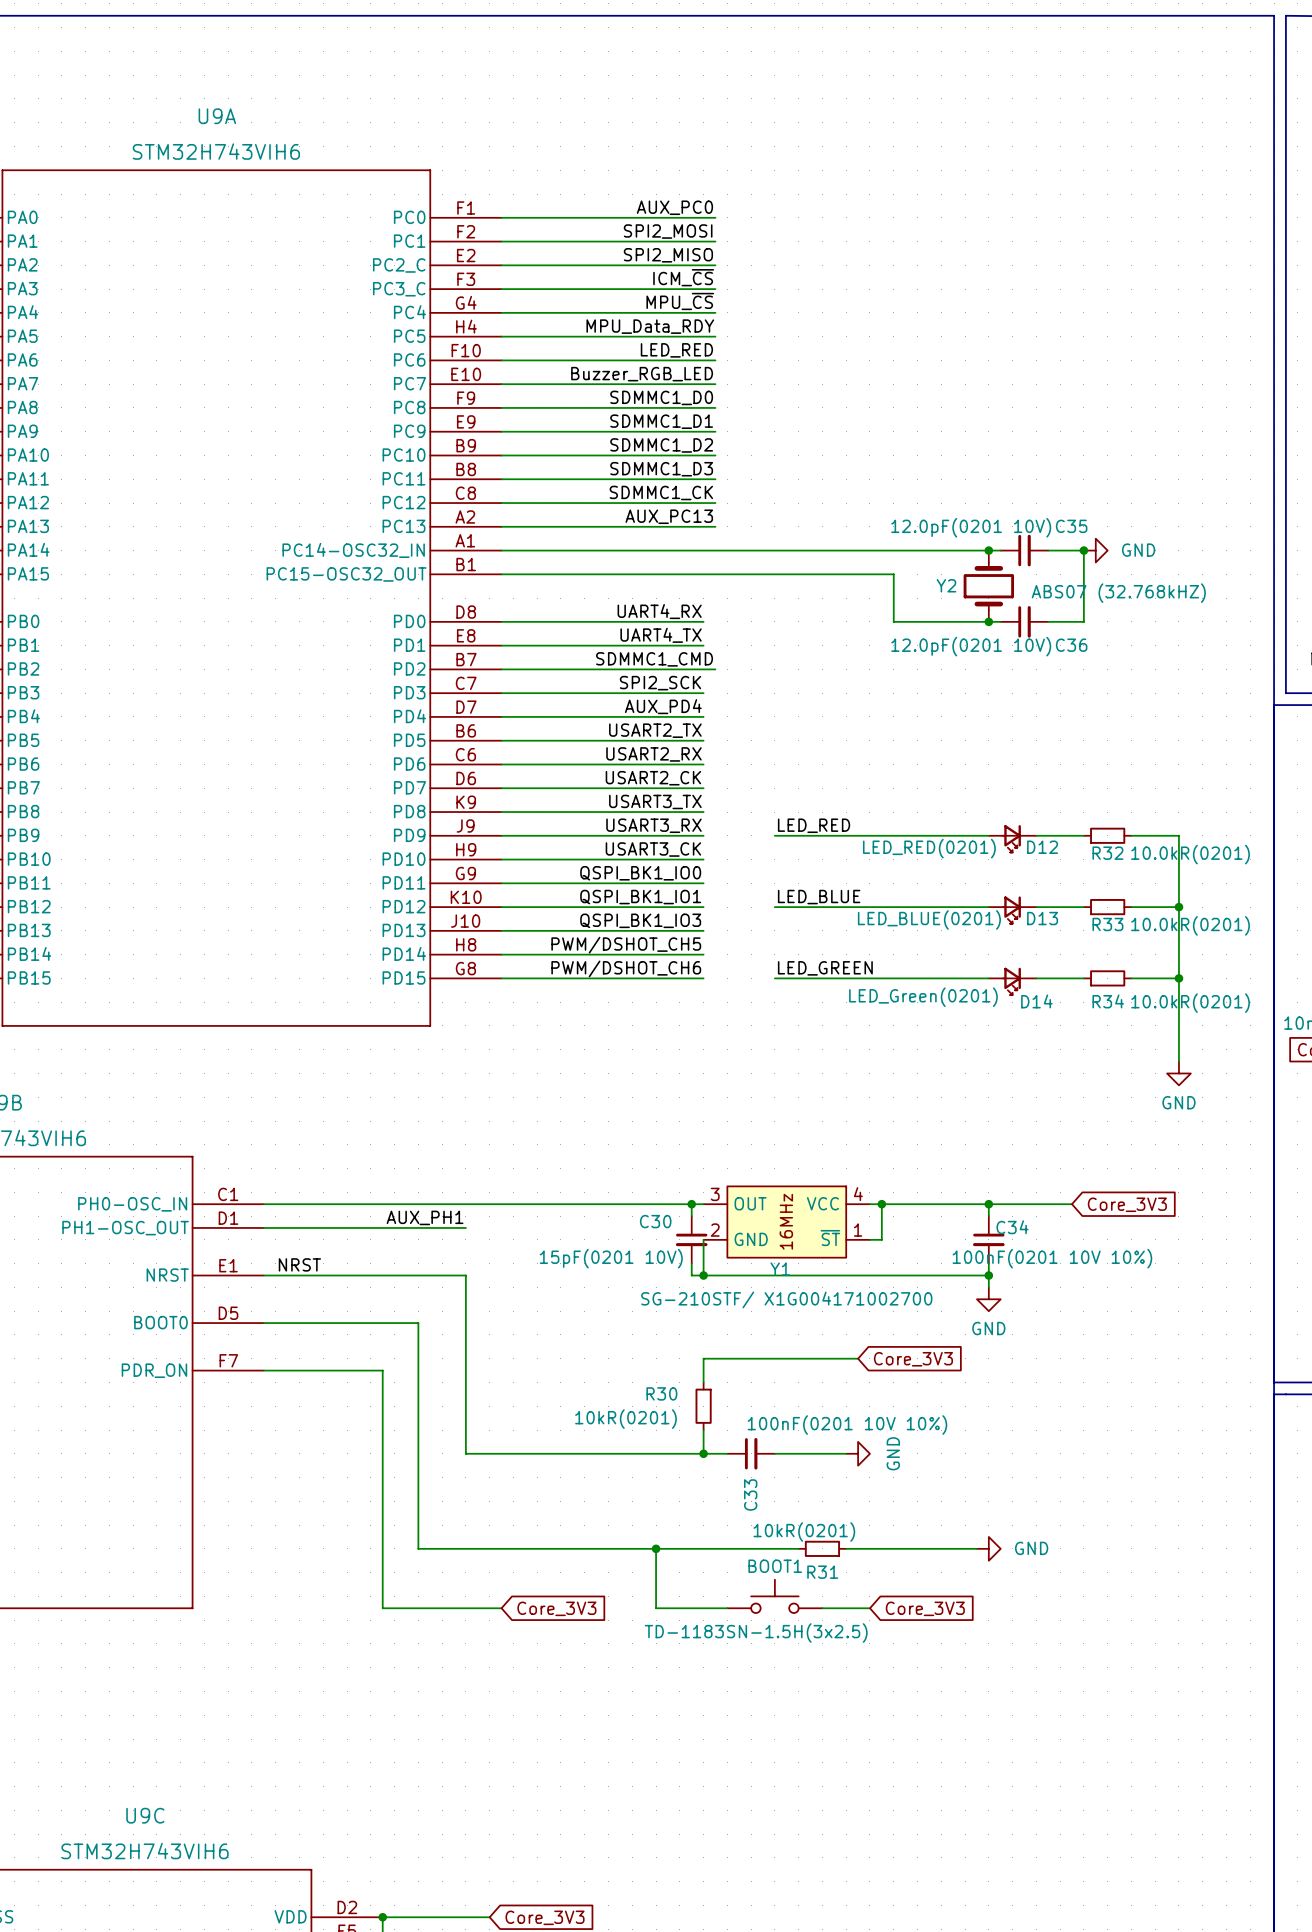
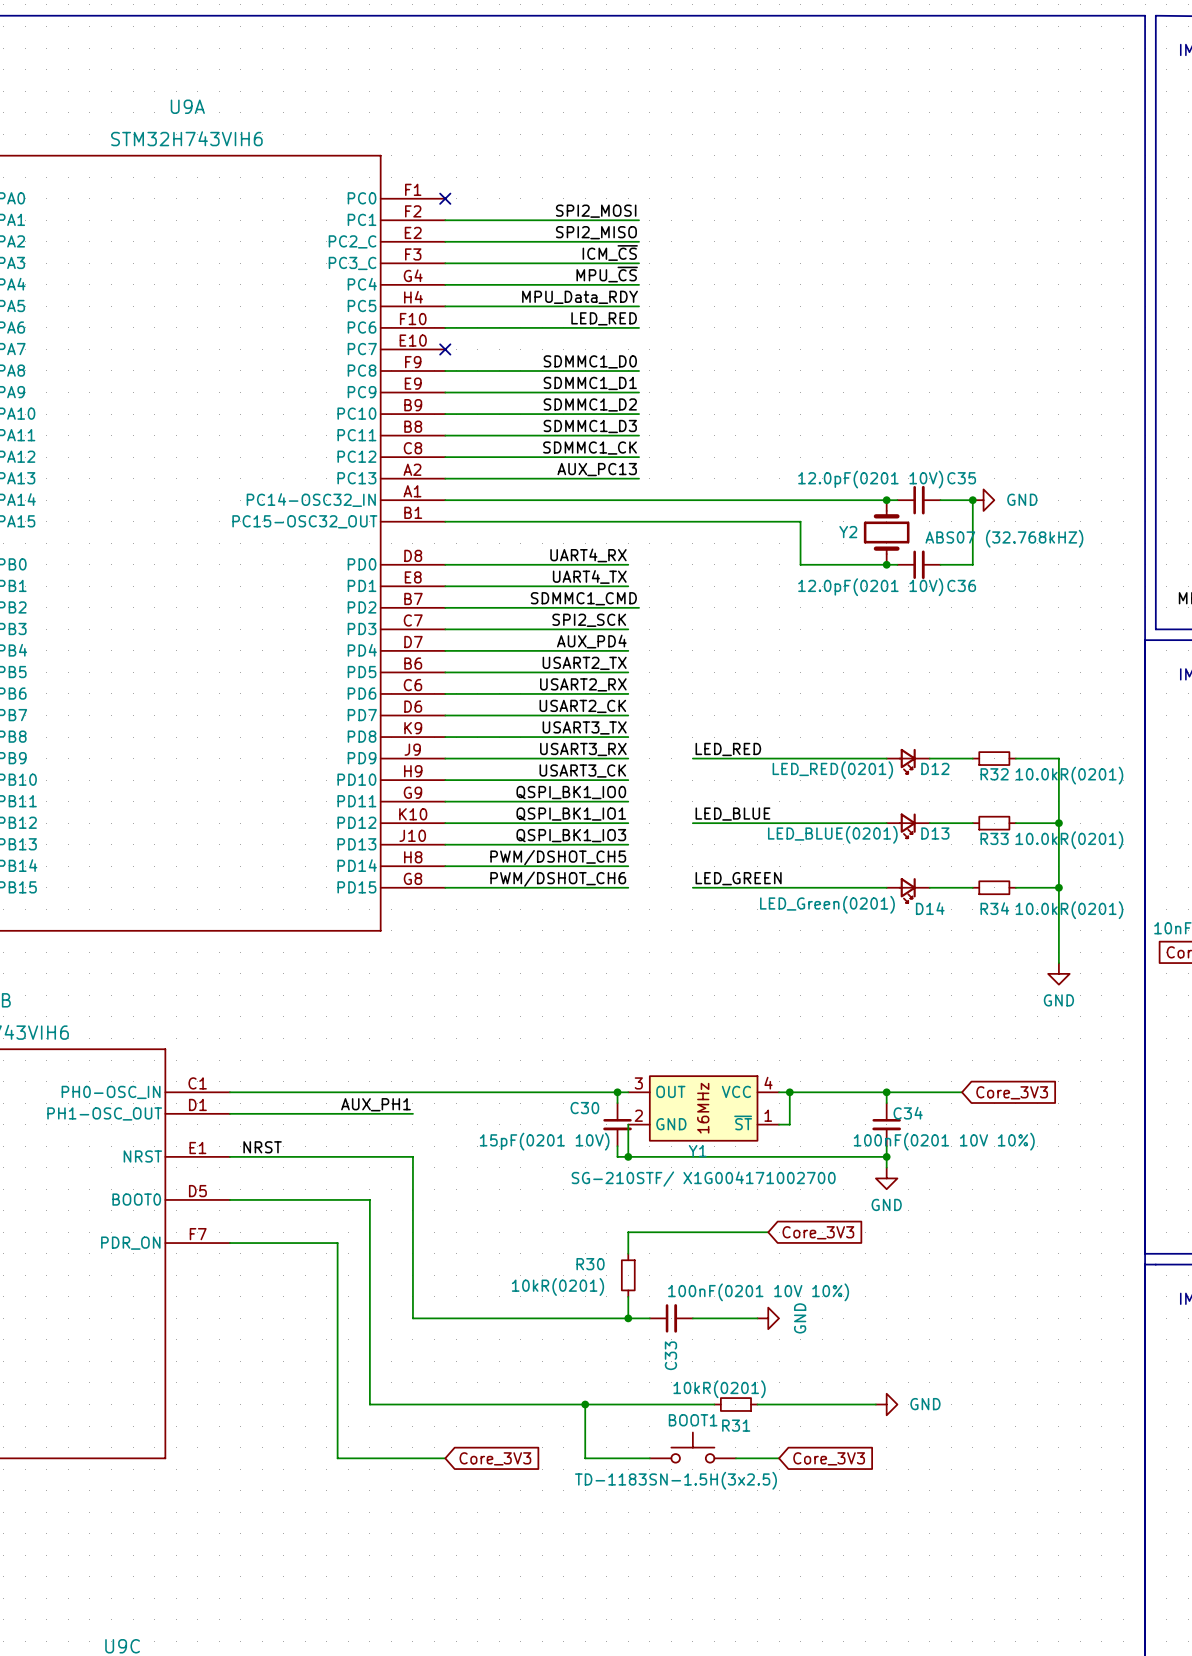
label: AUX_PC0 (674, 207) -> none
wire: (501, 217) (715, 217) -> none
no-connect mark: none -> (445, 198)
label: Buzzer_RGB_LED (642, 374) -> none
wire: (501, 384) (715, 384) -> none
no-connect mark: none -> (445, 349)

